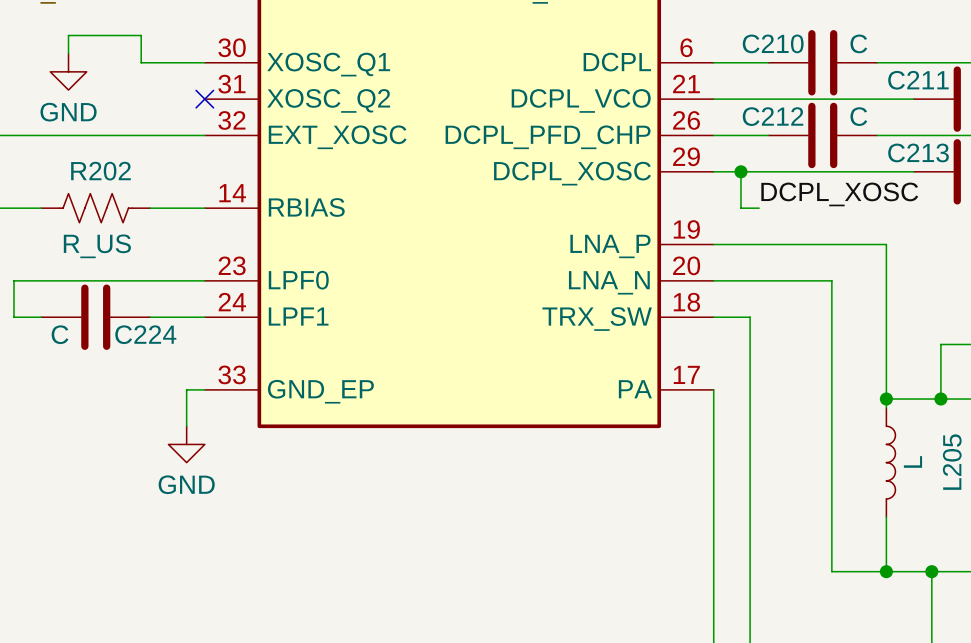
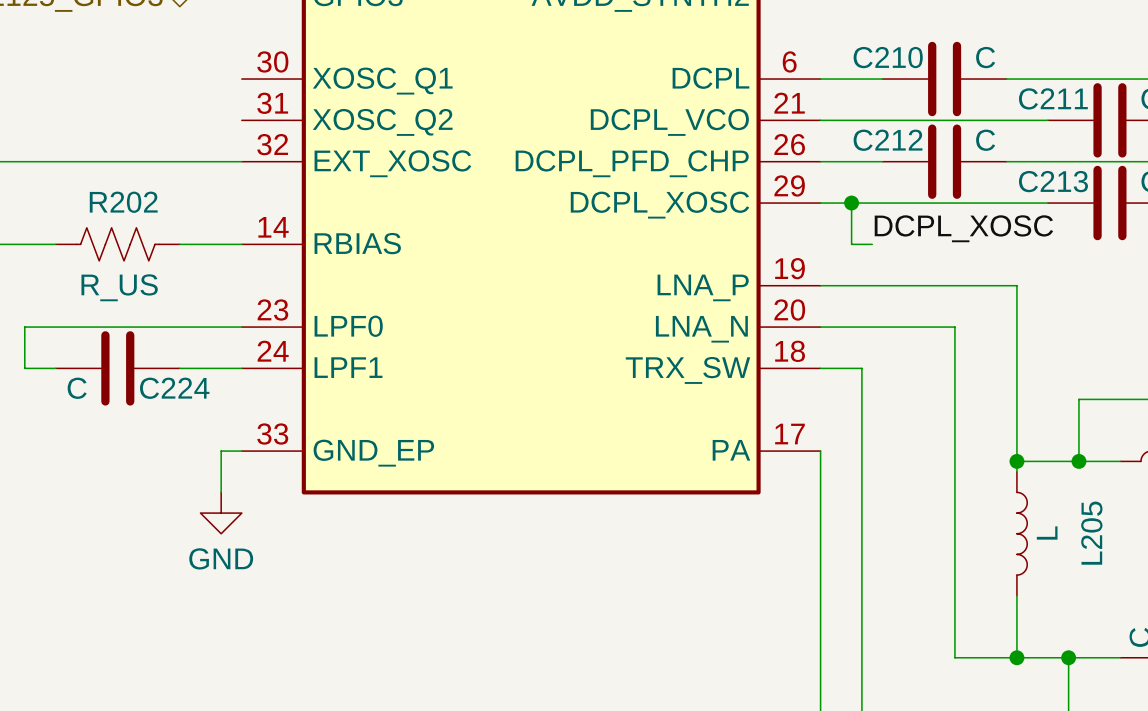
wire: (68, 53) (68, 35) (141, 35) (141, 62) (204, 62) -> none
power symbol: GND (68, 71) -> none
no-connect mark: (204, 99) -> none

